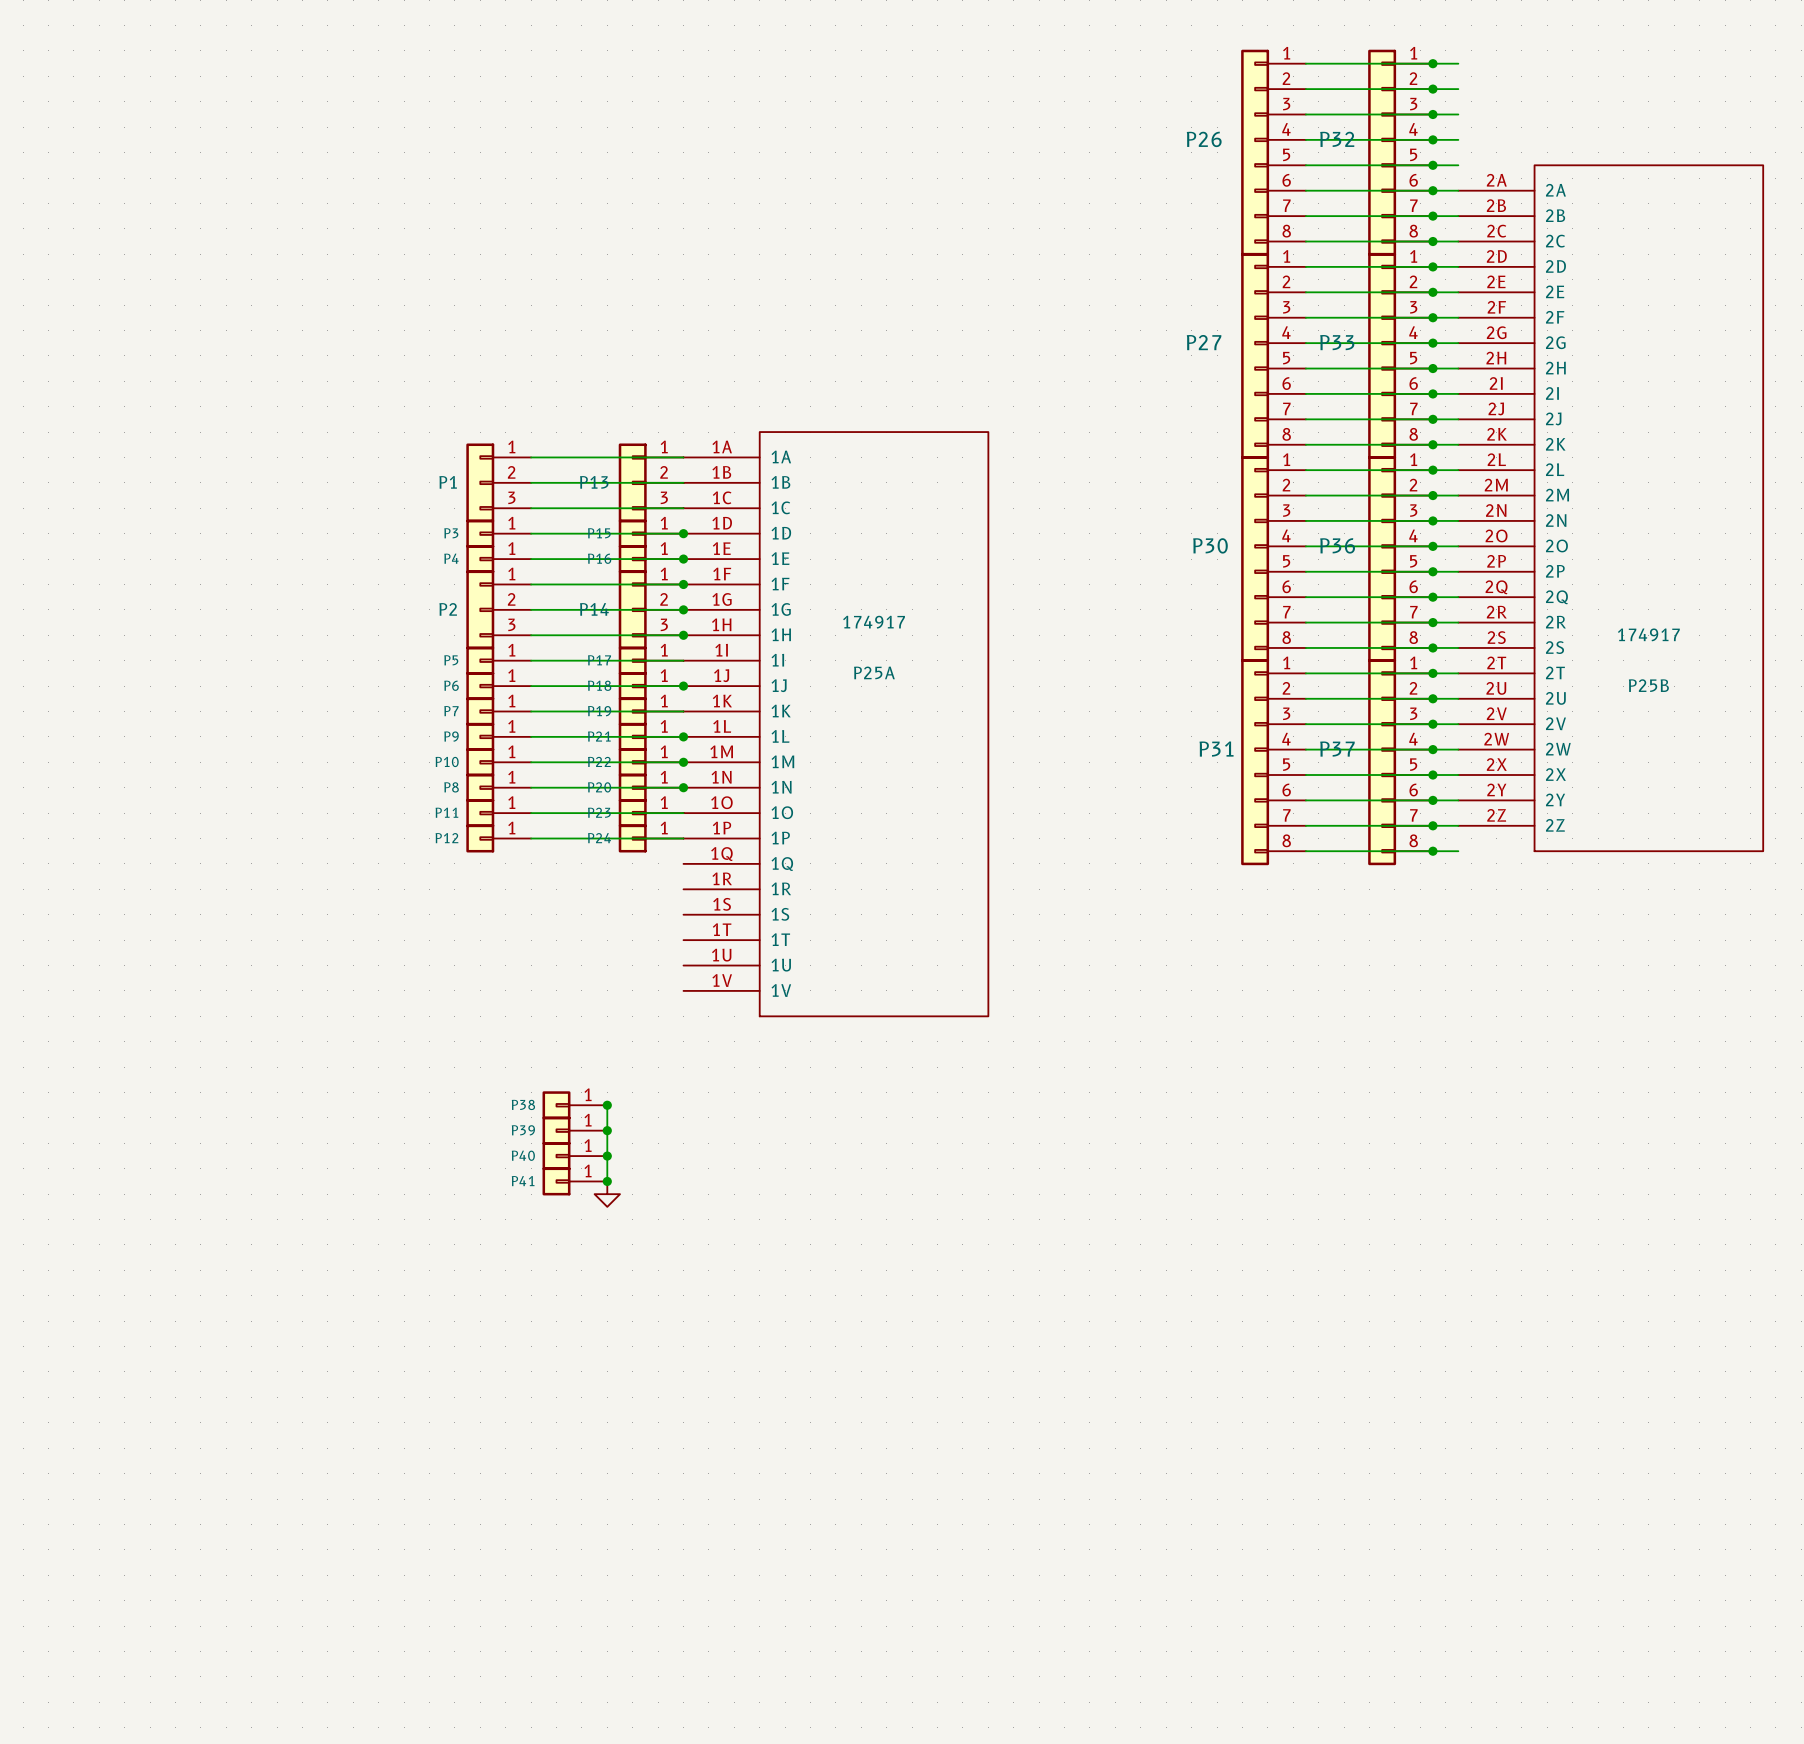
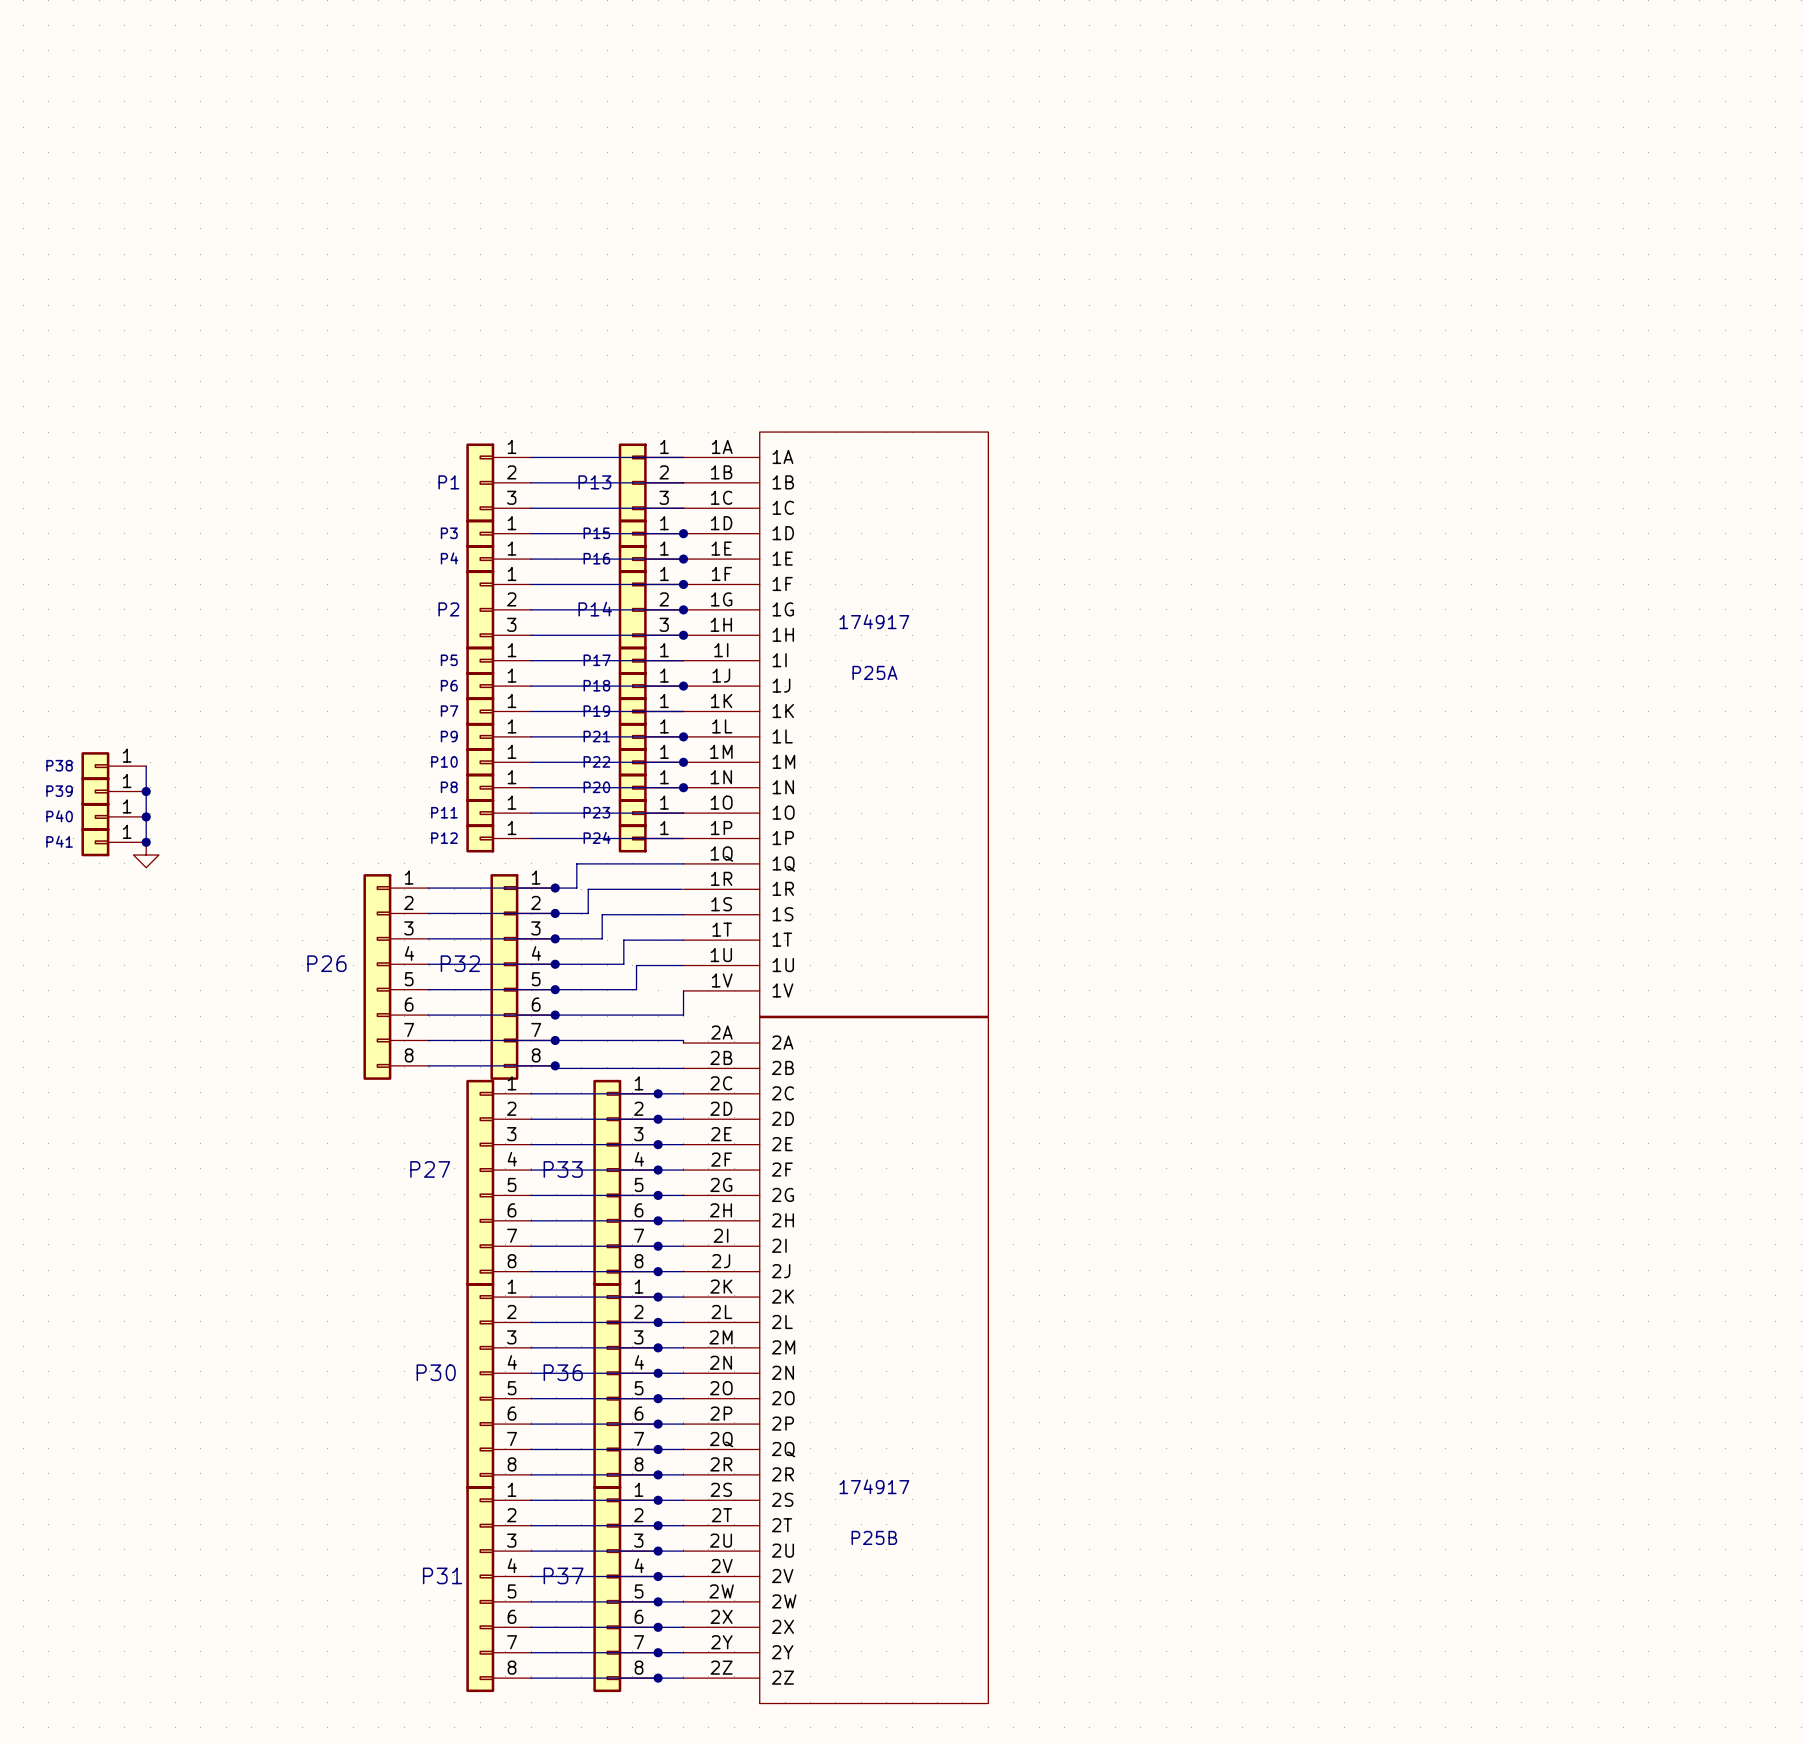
wire: (1305, 63) (1458, 63) -> none
junction: (1432, 63) -> none
wire: (1305, 89) (1458, 89) -> none
junction: (1432, 89) -> none
wire: (1305, 114) (1458, 114) -> none
junction: (1432, 114) -> none
wire: (1305, 139) (1458, 139) -> none
junction: (1432, 139) -> none
P26 position: (1273, 152) -> (395, 976)
P32 position: (1400, 152) -> (522, 976)
wire: (1305, 165) (1458, 165) -> none
junction: (1432, 165) -> none
wire: (1305, 190) (1458, 190) -> none
junction: (1432, 190) -> none
wire: (1305, 216) (1458, 216) -> none
junction: (1432, 216) -> none
wire: (1305, 241) (1458, 241) -> none
junction: (1432, 241) -> none
wire: (1305, 266) (1458, 266) -> none
junction: (1432, 266) -> none
wire: (1305, 292) (1458, 292) -> none
junction: (1432, 292) -> none
wire: (1305, 317) (1458, 317) -> none
junction: (1432, 317) -> none
wire: (1305, 343) (1458, 343) -> none
junction: (1432, 343) -> none
P27 position: (1273, 355) -> (498, 1182)
P33 position: (1400, 355) -> (625, 1182)
wire: (1305, 368) (1458, 368) -> none
junction: (1432, 368) -> none
wire: (1305, 393) (1458, 393) -> none
junction: (1432, 393) -> none
wire: (1305, 419) (1458, 419) -> none
junction: (1432, 419) -> none
wire: (1305, 444) (1458, 444) -> none
junction: (1432, 444) -> none
wire: (1305, 470) (1458, 470) -> none
junction: (1432, 470) -> none
wire: (1305, 495) (1458, 495) -> none
junction: (1432, 495) -> none
P25B position: (1610, 508) -> (835, 1360)
wire: (1305, 520) (1458, 520) -> none
junction: (1432, 520) -> none
wire: (1305, 546) (1458, 546) -> none
junction: (1432, 546) -> none
P30 position: (1273, 559) -> (498, 1385)
P36 position: (1400, 559) -> (625, 1385)
wire: (1305, 571) (1458, 571) -> none
junction: (1432, 571) -> none
wire: (1305, 597) (1458, 597) -> none
junction: (1432, 597) -> none
wire: (1305, 622) (1458, 622) -> none
junction: (1432, 622) -> none
wire: (1305, 647) (1458, 647) -> none
junction: (1432, 647) -> none
wire: (1305, 673) (1458, 673) -> none
junction: (1432, 673) -> none
wire: (1305, 698) (1458, 698) -> none
junction: (1432, 698) -> none
wire: (1305, 724) (1458, 724) -> none
junction: (1432, 724) -> none
wire: (1305, 749) (1458, 749) -> none
junction: (1432, 749) -> none
P31 position: (1273, 762) -> (498, 1589)
P37 position: (1400, 762) -> (625, 1589)
wire: none -> (146, 766) (146, 842)
wire: (1305, 775) (1458, 775) -> none
junction: (1432, 775) -> none
junction: none -> (146, 791)
wire: (1305, 800) (1458, 800) -> none
junction: (1432, 800) -> none
junction: none -> (146, 816)
wire: (1305, 825) (1458, 825) -> none
junction: (1432, 825) -> none
junction: none -> (146, 842)
wire: (1305, 851) (1458, 851) -> none
junction: (1432, 851) -> none
power symbol: none -> (146, 855)
wire: none -> (683, 863) (576, 863) (576, 888) (428, 888)
junction: none -> (555, 888)
wire: none -> (682, 889) (588, 889) (588, 913) (428, 913)
junction: none -> (555, 913)
wire: none -> (683, 914) (602, 914) (602, 938) (428, 938)
junction: none -> (555, 938)
wire: none -> (683, 940) (623, 940) (623, 964) (428, 964)
junction: none -> (555, 964)
wire: none -> (683, 965) (636, 965) (636, 989) (428, 989)
junction: none -> (555, 989)
wire: none -> (683, 990) (683, 1015) (428, 1015)
junction: none -> (555, 1015)
wire: none -> (428, 1040) (683, 1040) (683, 1043)
junction: none -> (555, 1040)
wire: none -> (428, 1065) (683, 1068)
junction: none -> (555, 1065)
wire: none -> (531, 1093) (683, 1093)
junction: none -> (658, 1093)
P38 position: (574, 1105) -> (113, 766)
junction: (607, 1105) -> none
wire: none -> (531, 1119) (683, 1119)
junction: none -> (658, 1119)
P39 position: (574, 1130) -> (113, 791)
junction: (607, 1130) -> none
wire: none -> (531, 1144) (683, 1144)
junction: none -> (658, 1144)
P40 position: (574, 1156) -> (113, 816)
junction: (607, 1156) -> none
wire: none -> (531, 1170) (683, 1170)
junction: none -> (658, 1170)
P41 position: (574, 1181) -> (113, 842)
junction: (607, 1181) -> none
power symbol: (607, 1194) -> none
wire: none -> (531, 1195) (683, 1195)
junction: none -> (658, 1195)
wire: none -> (531, 1220) (683, 1220)
junction: none -> (658, 1220)
wire: none -> (531, 1246) (683, 1246)
junction: none -> (658, 1246)
wire: none -> (531, 1271) (683, 1271)
junction: none -> (658, 1271)
wire: none -> (531, 1297) (683, 1297)
junction: none -> (658, 1297)
wire: none -> (531, 1322) (683, 1322)
junction: none -> (658, 1322)
wire: none -> (531, 1347) (683, 1347)
junction: none -> (658, 1347)
wire: none -> (531, 1373) (683, 1373)
junction: none -> (658, 1373)
wire: none -> (531, 1398) (683, 1398)
junction: none -> (658, 1398)
wire: none -> (531, 1424) (683, 1424)
junction: none -> (658, 1424)
wire: none -> (531, 1449) (683, 1449)
junction: none -> (658, 1449)
wire: none -> (531, 1474) (683, 1474)
junction: none -> (658, 1474)
wire: none -> (531, 1500) (683, 1500)
junction: none -> (658, 1500)
wire: none -> (531, 1525) (683, 1525)
junction: none -> (658, 1525)
wire: none -> (531, 1551) (683, 1551)
junction: none -> (658, 1551)
wire: none -> (531, 1576) (683, 1576)
junction: none -> (658, 1576)
wire: none -> (531, 1601) (683, 1601)
junction: none -> (658, 1601)
wire: none -> (531, 1627) (683, 1627)
junction: none -> (658, 1627)
wire: none -> (531, 1652) (683, 1652)
junction: none -> (658, 1652)
wire: none -> (531, 1678) (683, 1678)
junction: none -> (658, 1678)

